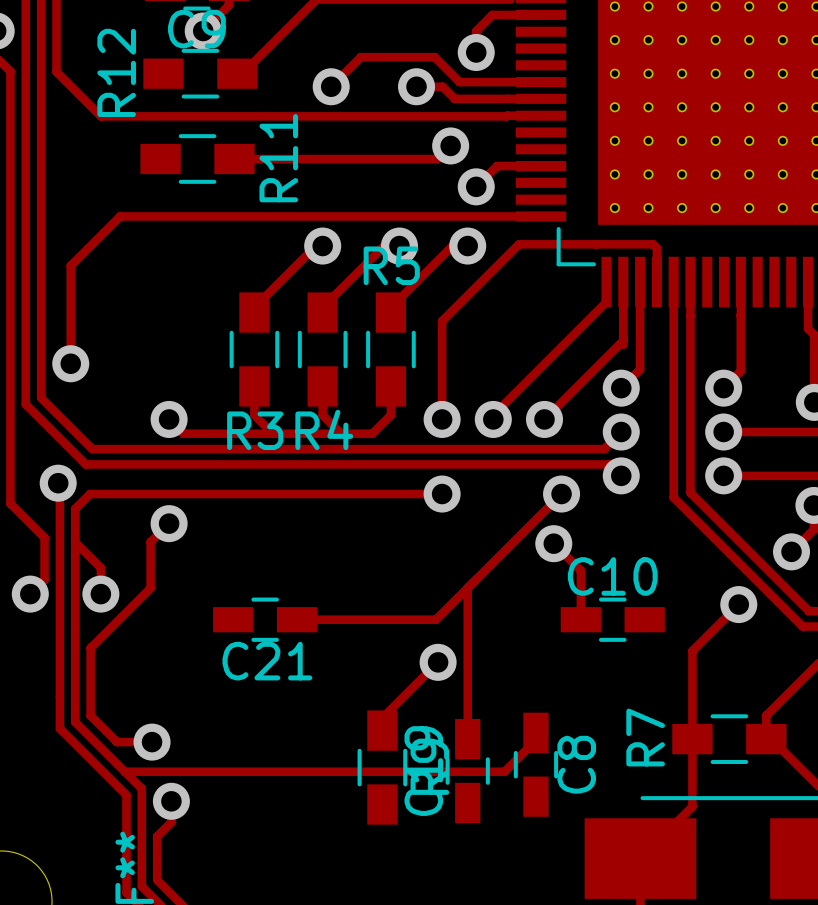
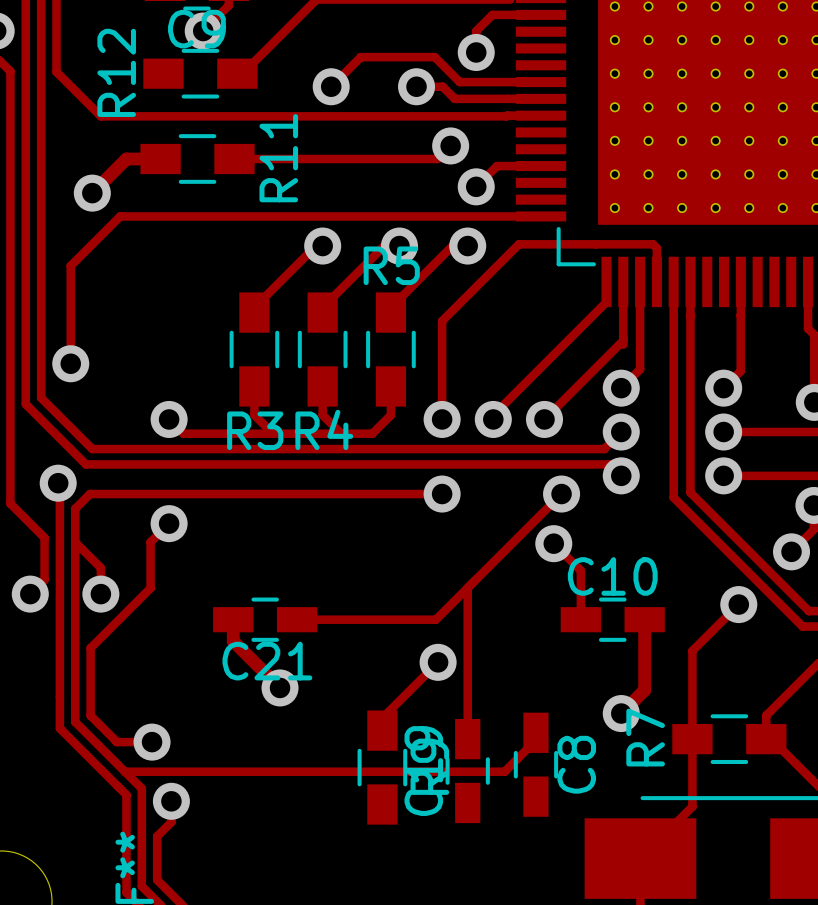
track: none -> (160, 159) (126, 159) (92, 193)
via: none -> (92, 193)
track: none -> (233, 619) (233, 641) (280, 687)
track: none -> (644, 619) (644, 690) (621, 713)
via: none -> (280, 687)
via: none -> (621, 713)

